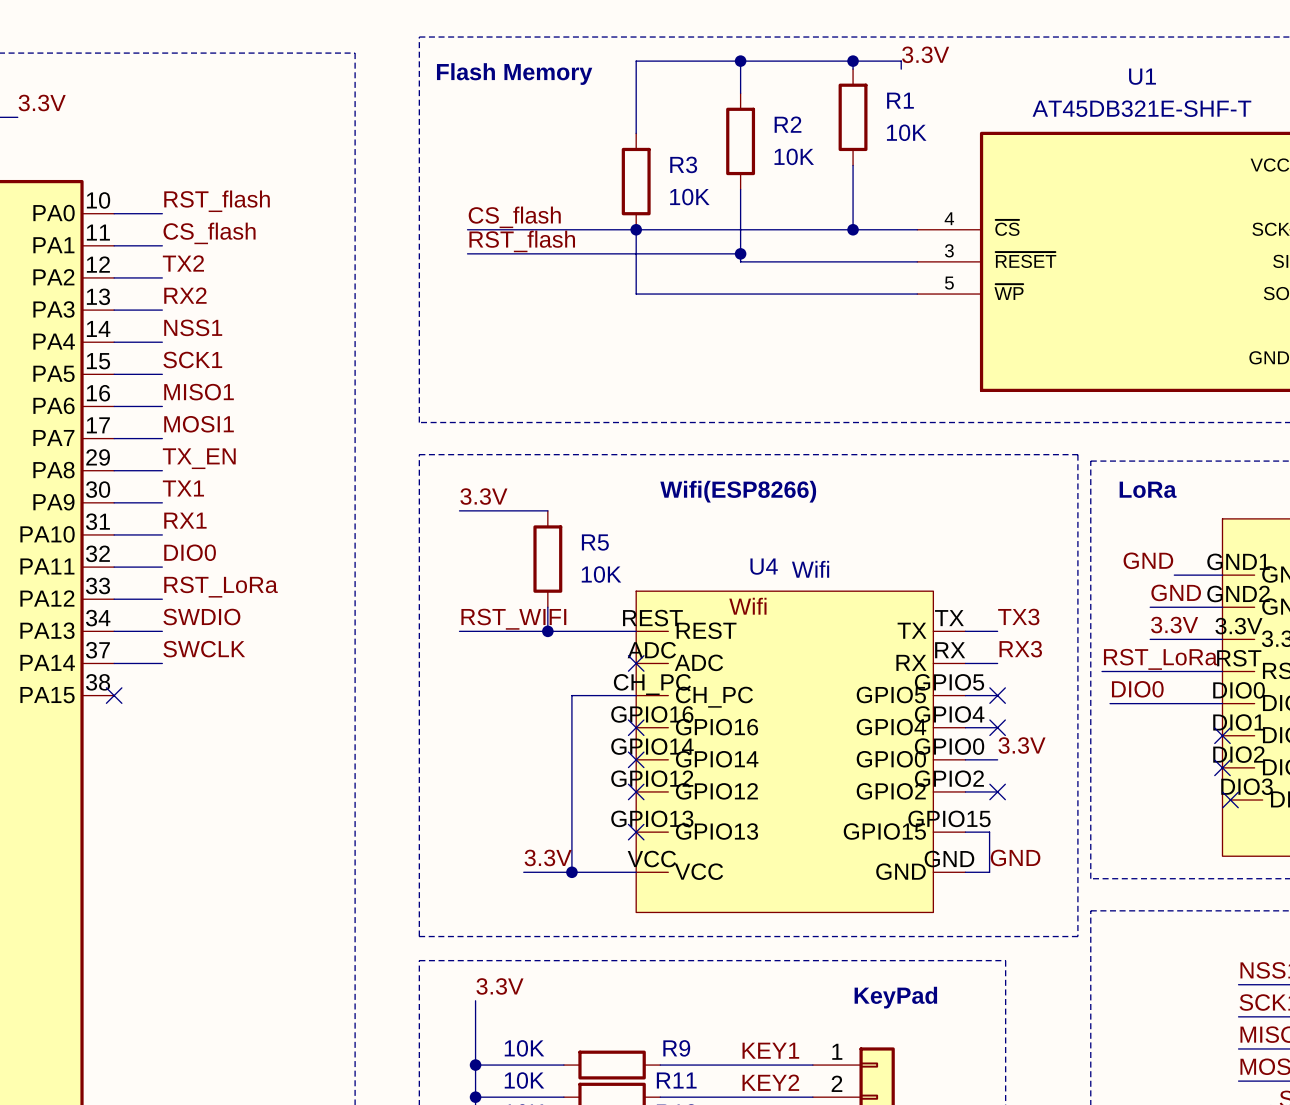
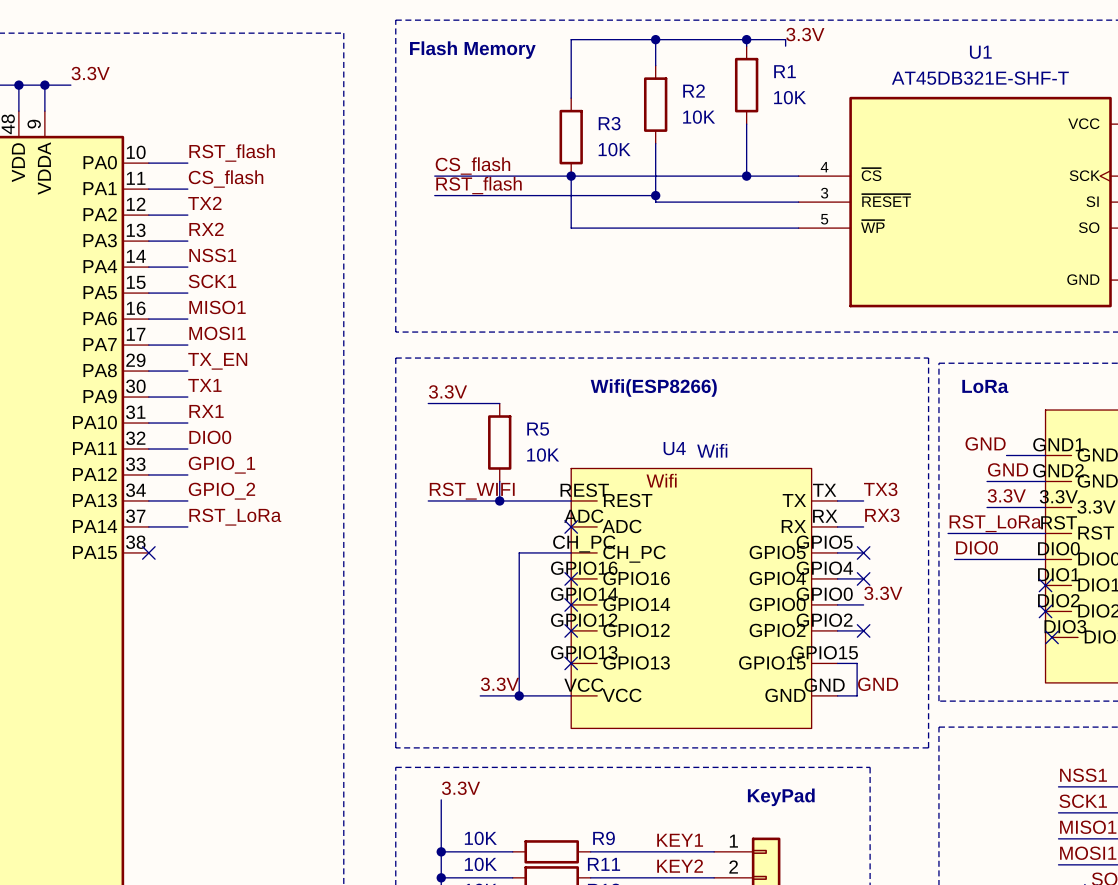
label: RST_LoRa (221, 587) -> GPIO_1 (221, 465)
label: SWDIO (201, 617) -> GPIO_2 (221, 491)
label: SWCLK (204, 649) -> RST_LoRa (235, 517)

